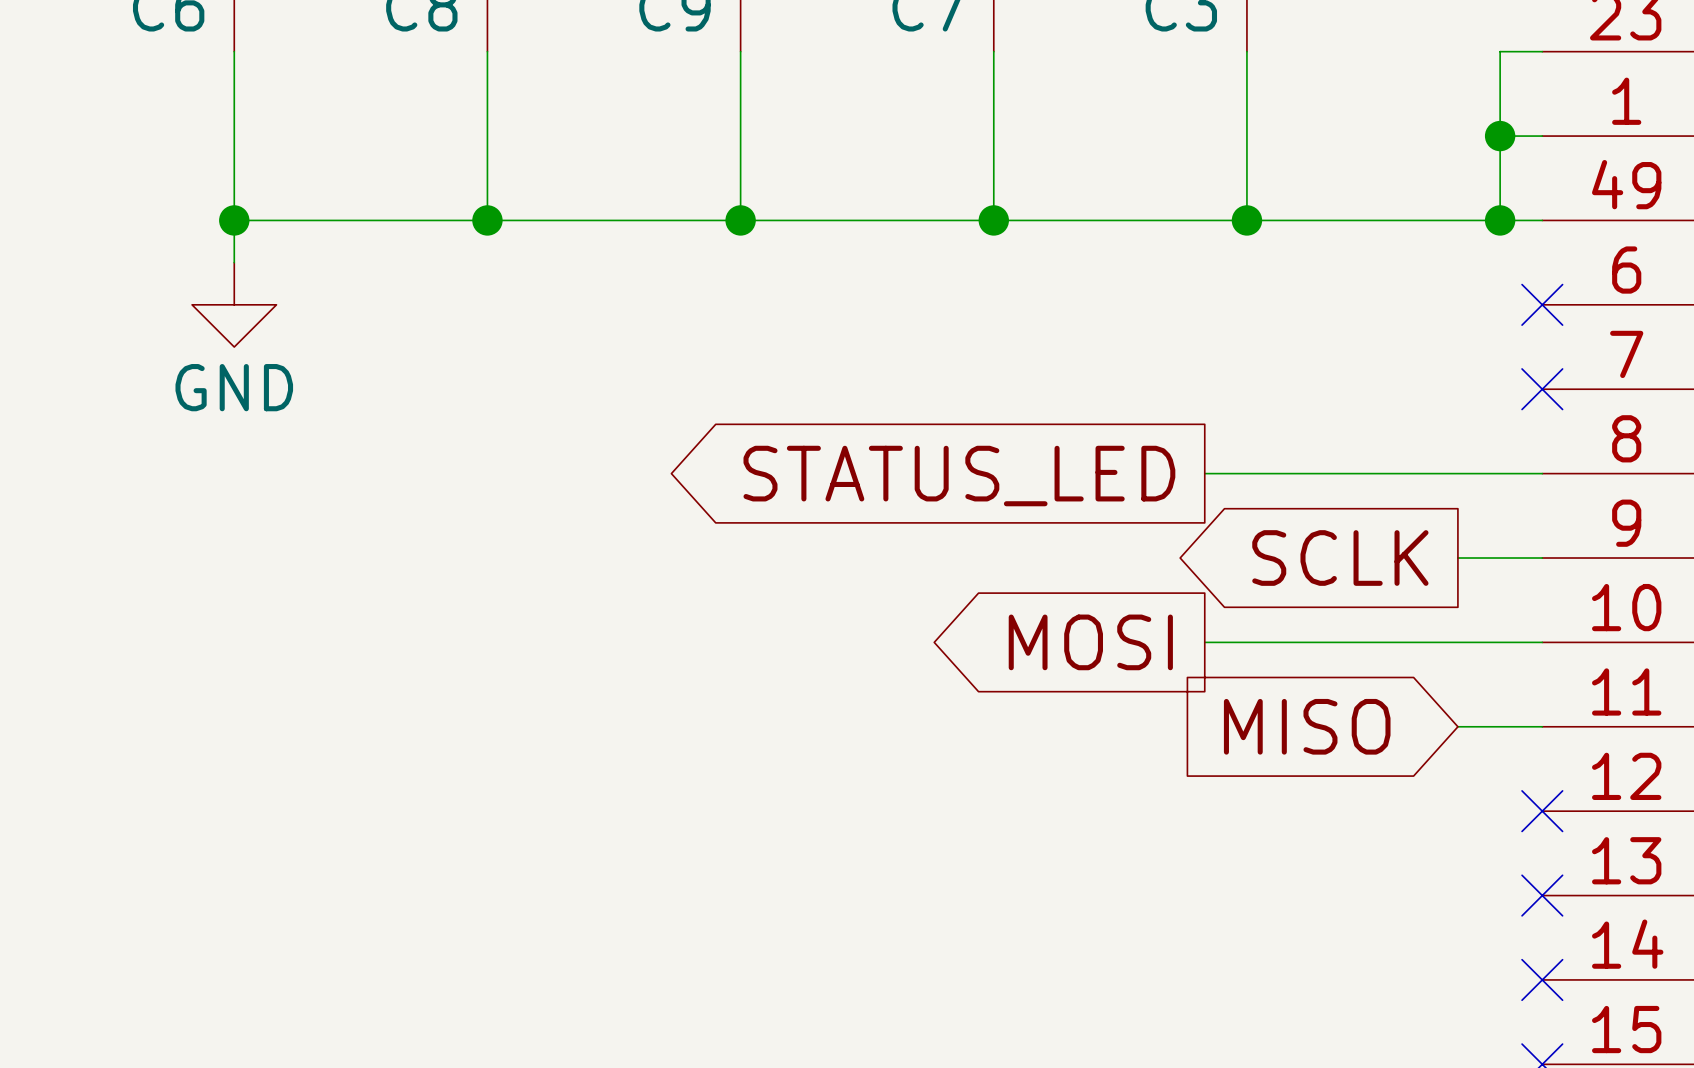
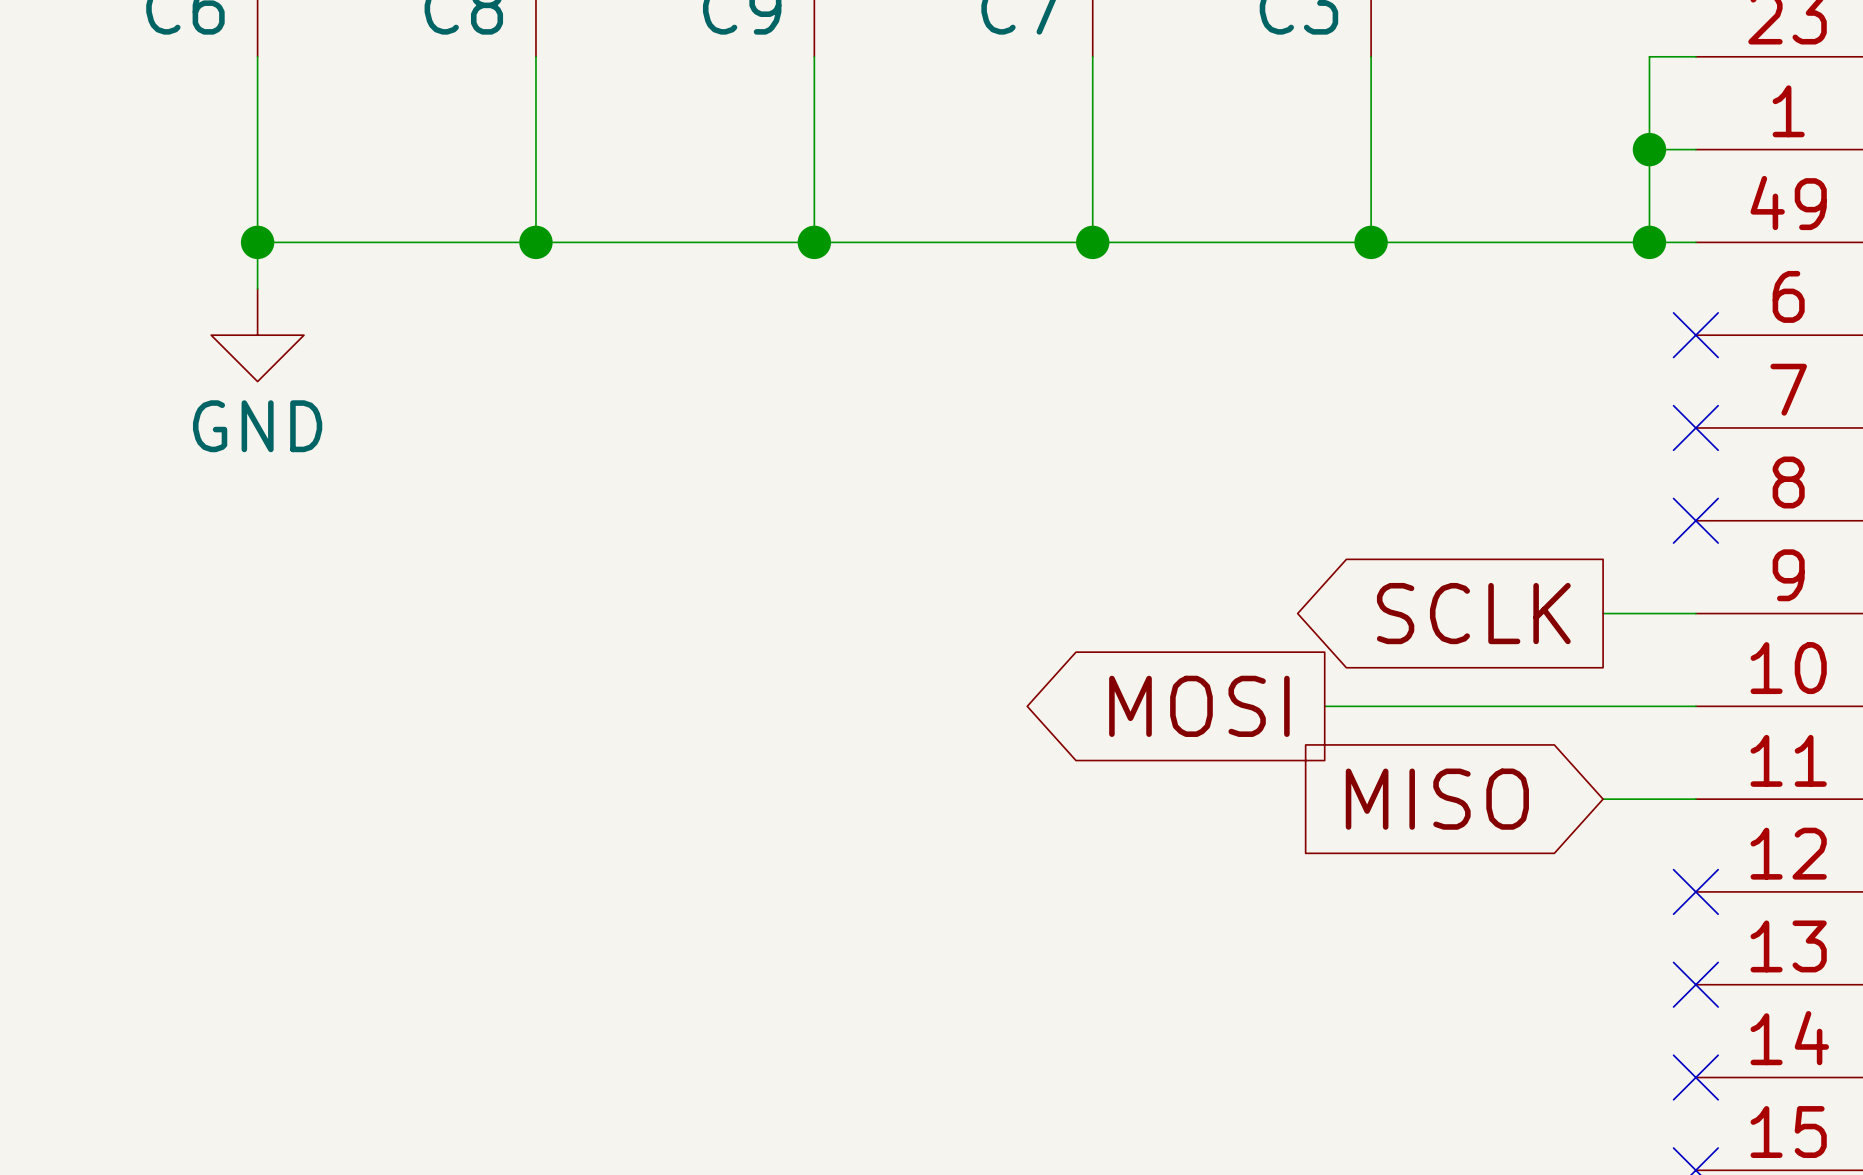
wire: (1204, 473) (1542, 473) -> none
no-connect mark: none -> (1695, 520)
global label: STATUS_LED (959, 476) -> none

